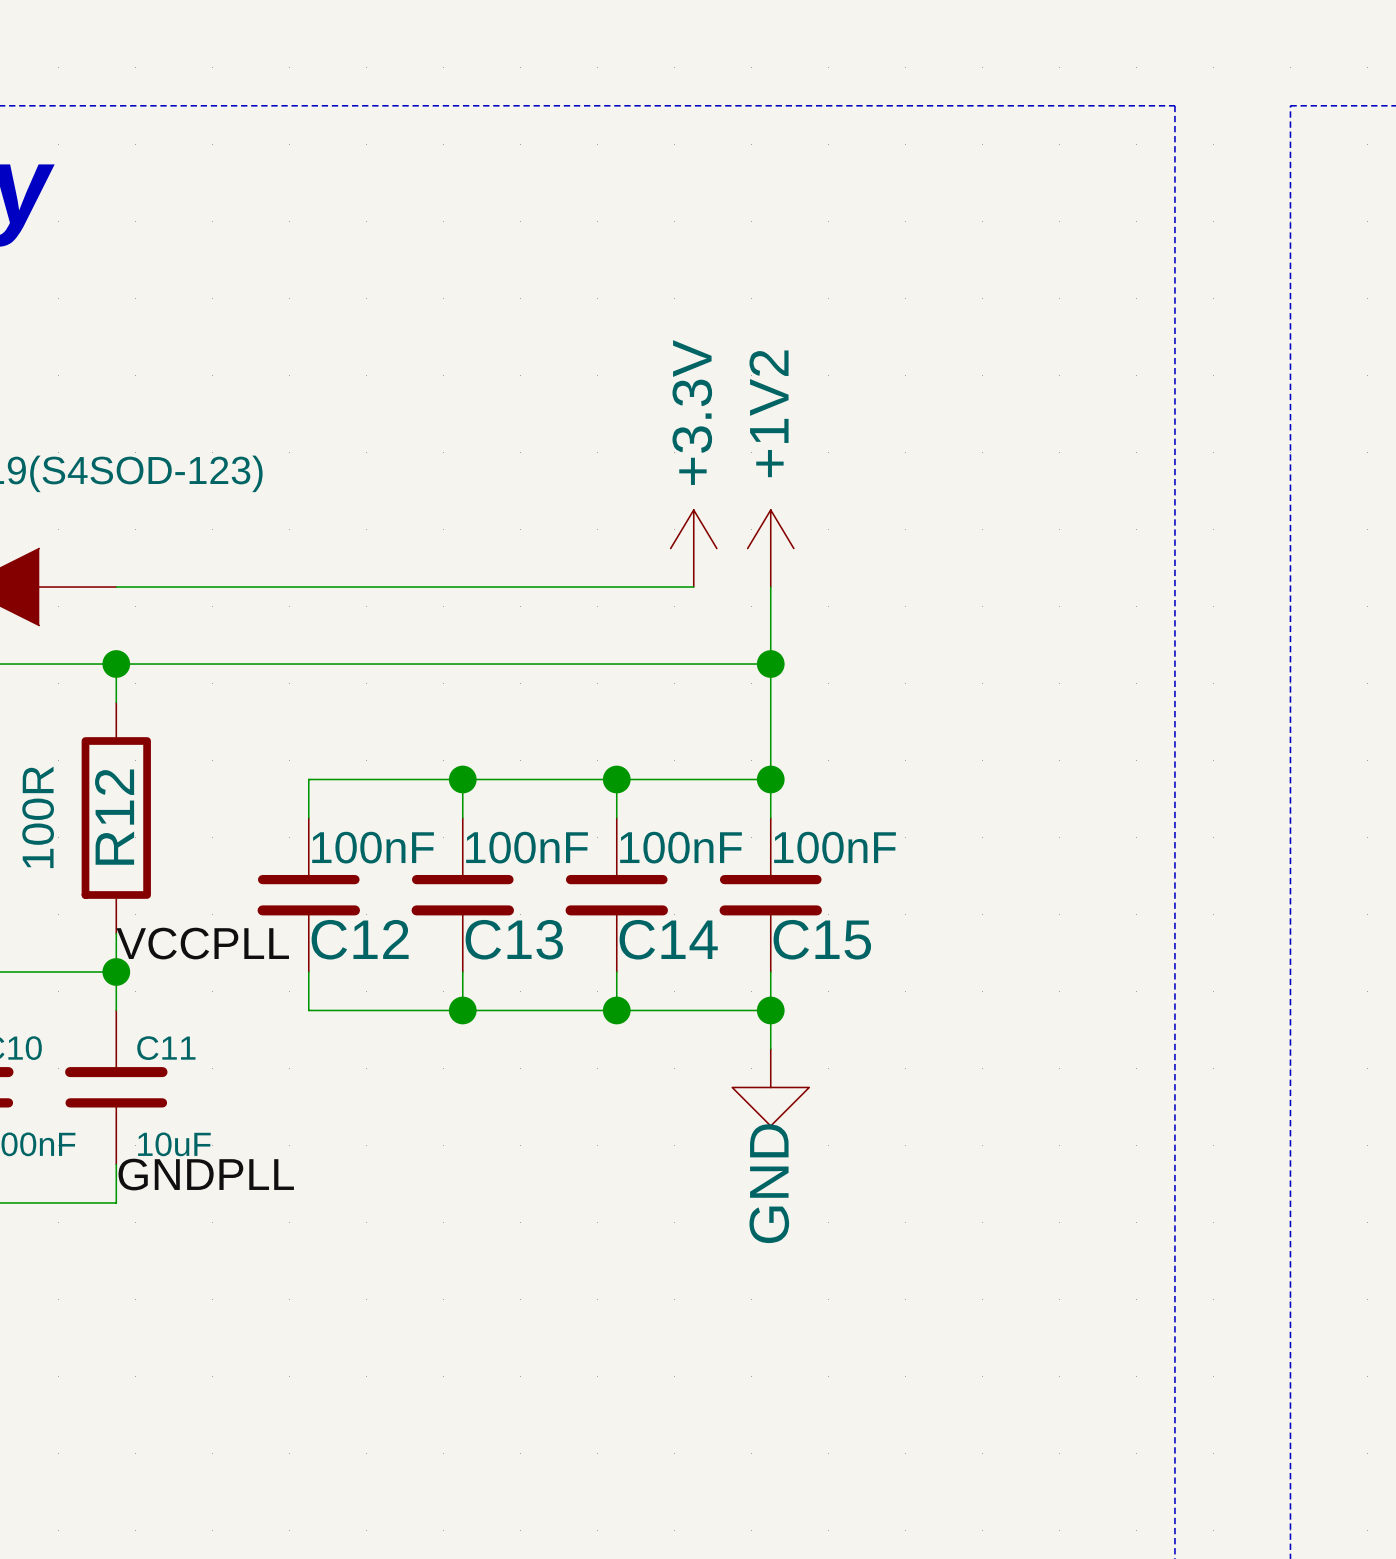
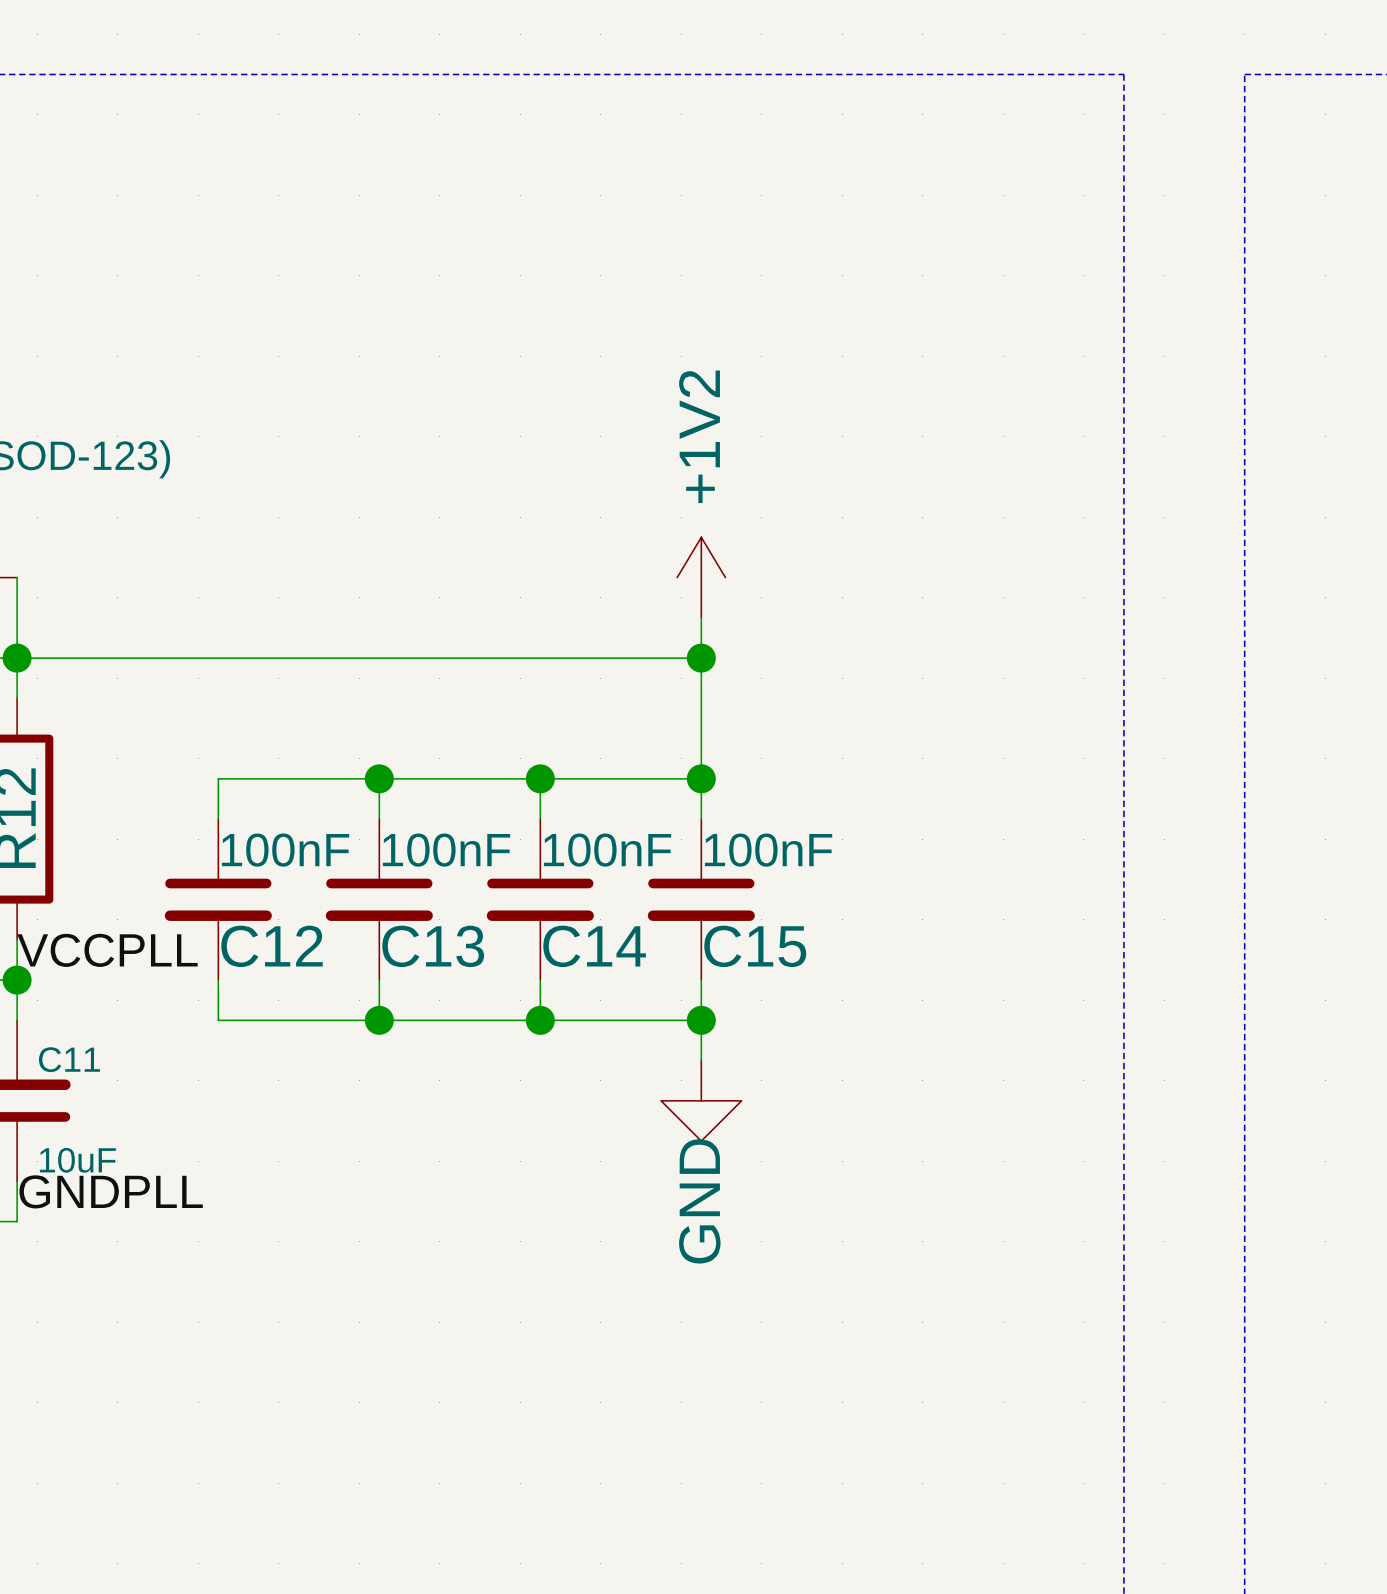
power symbol: +3.3V (693, 548) -> none
power symbol position: +1V2 (770, 548) -> +1V2 (701, 577)
wire: (116, 587) (693, 587) -> (17, 577) (17, 658)

